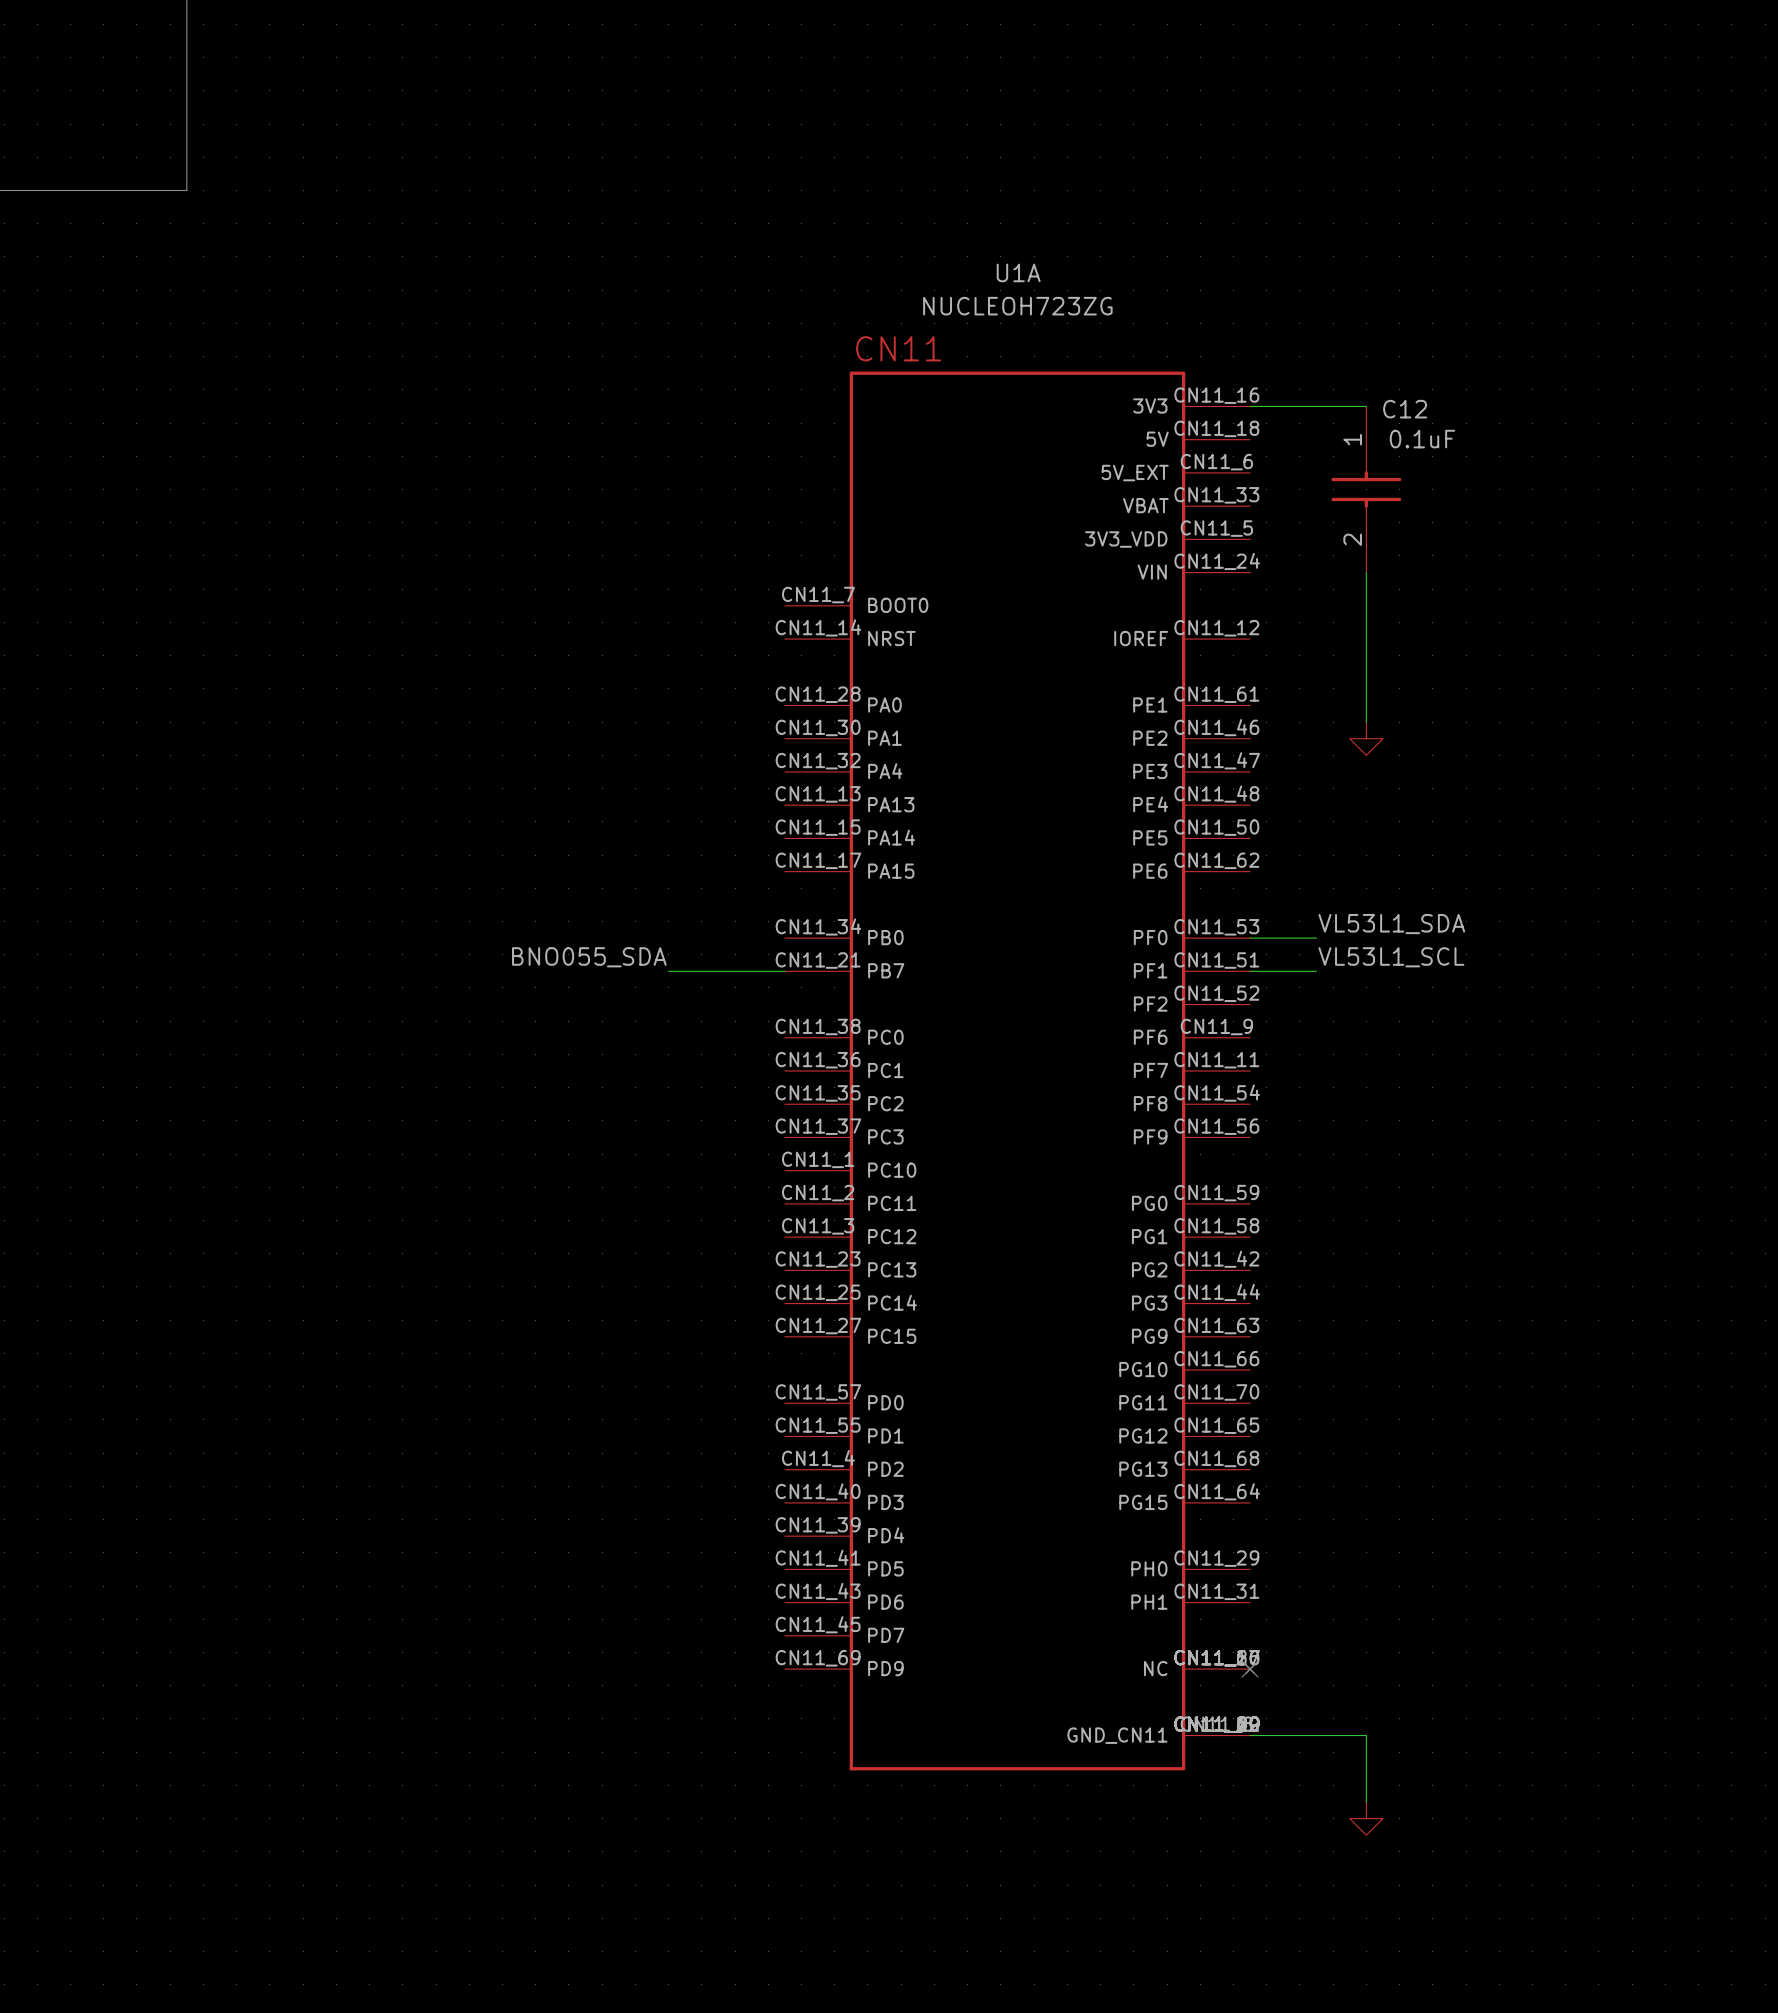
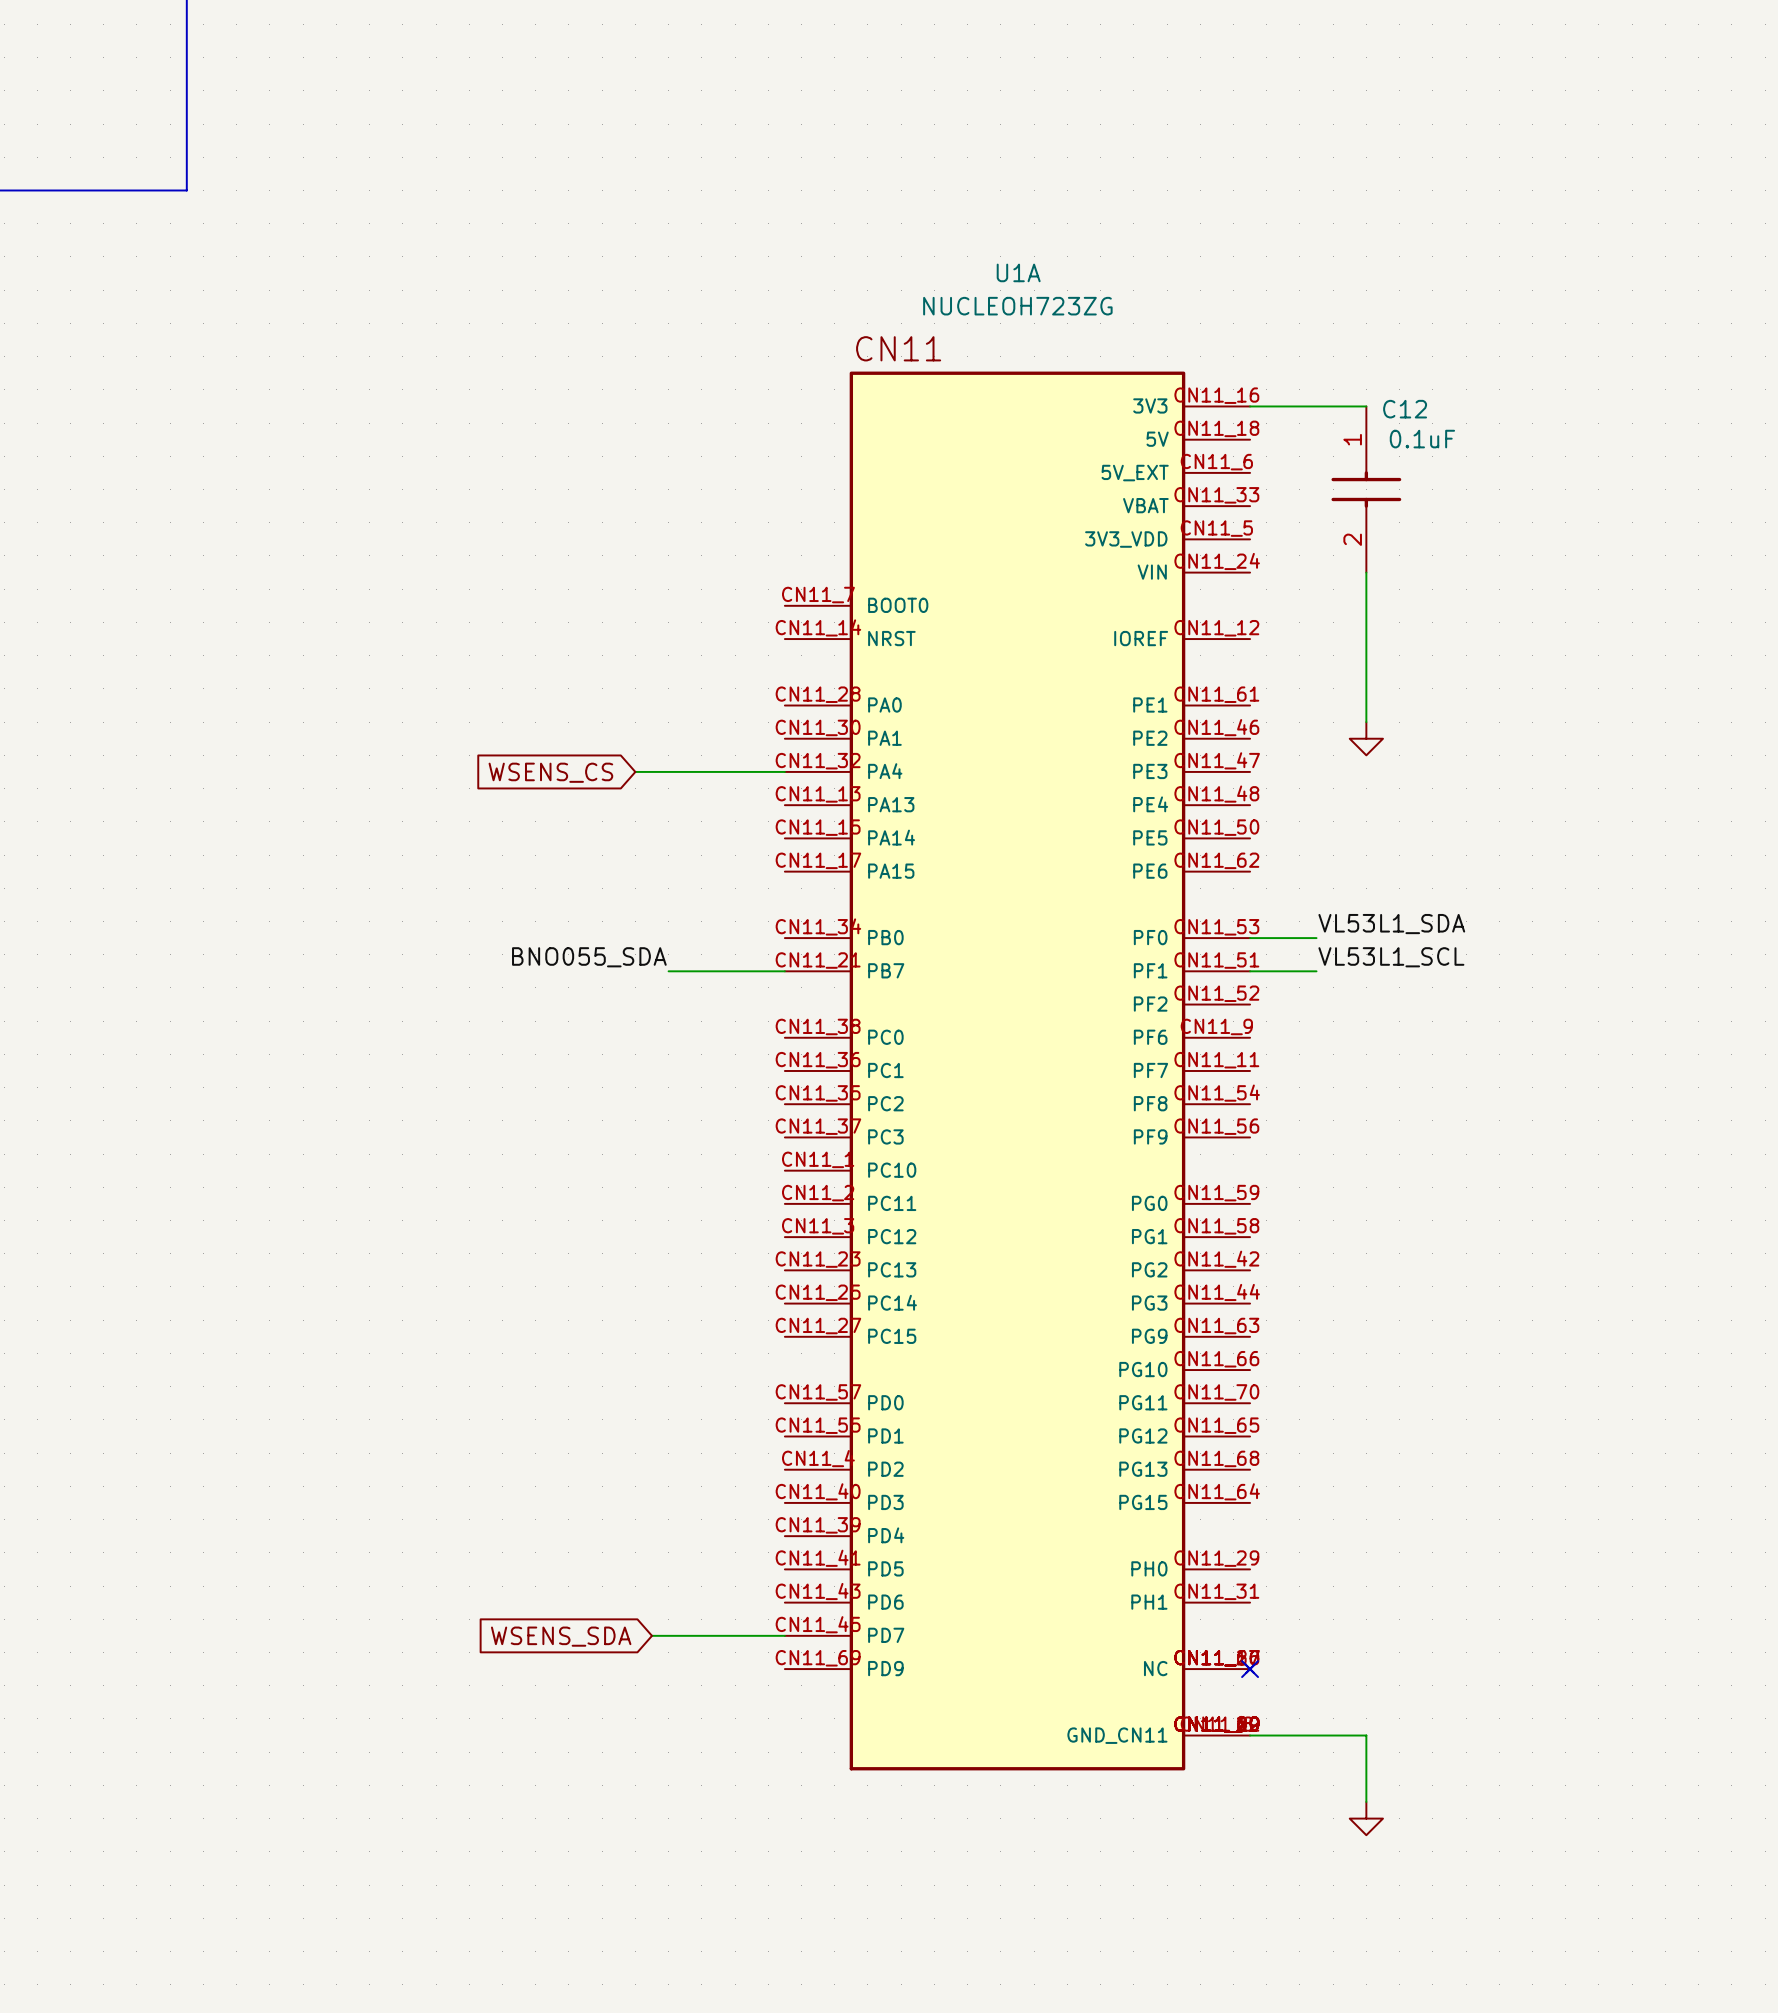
wire: none -> (635, 771) (784, 771)
global label: none -> WSENS_CS (550, 772)
wire: none -> (651, 1635) (784, 1635)
global label: none -> WSENS_SDA (561, 1636)

